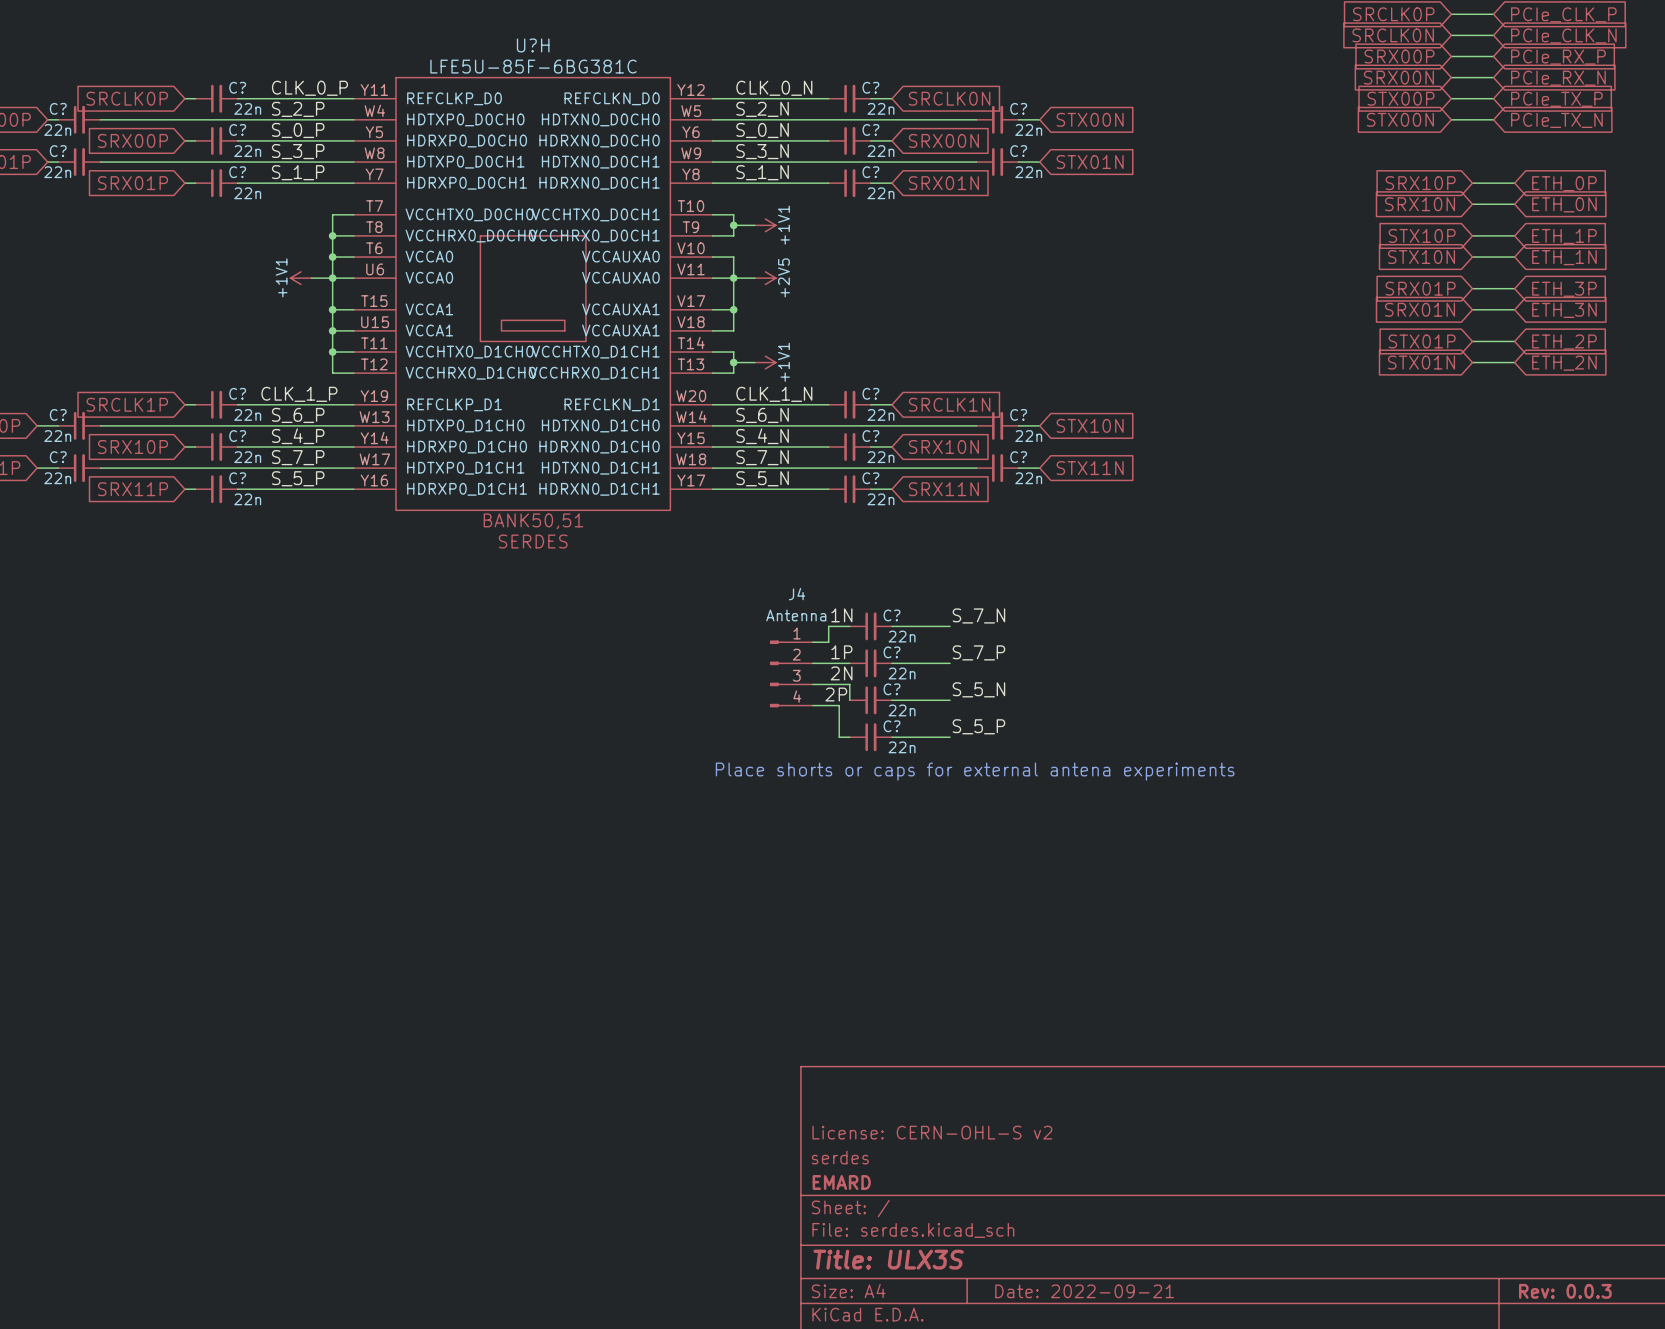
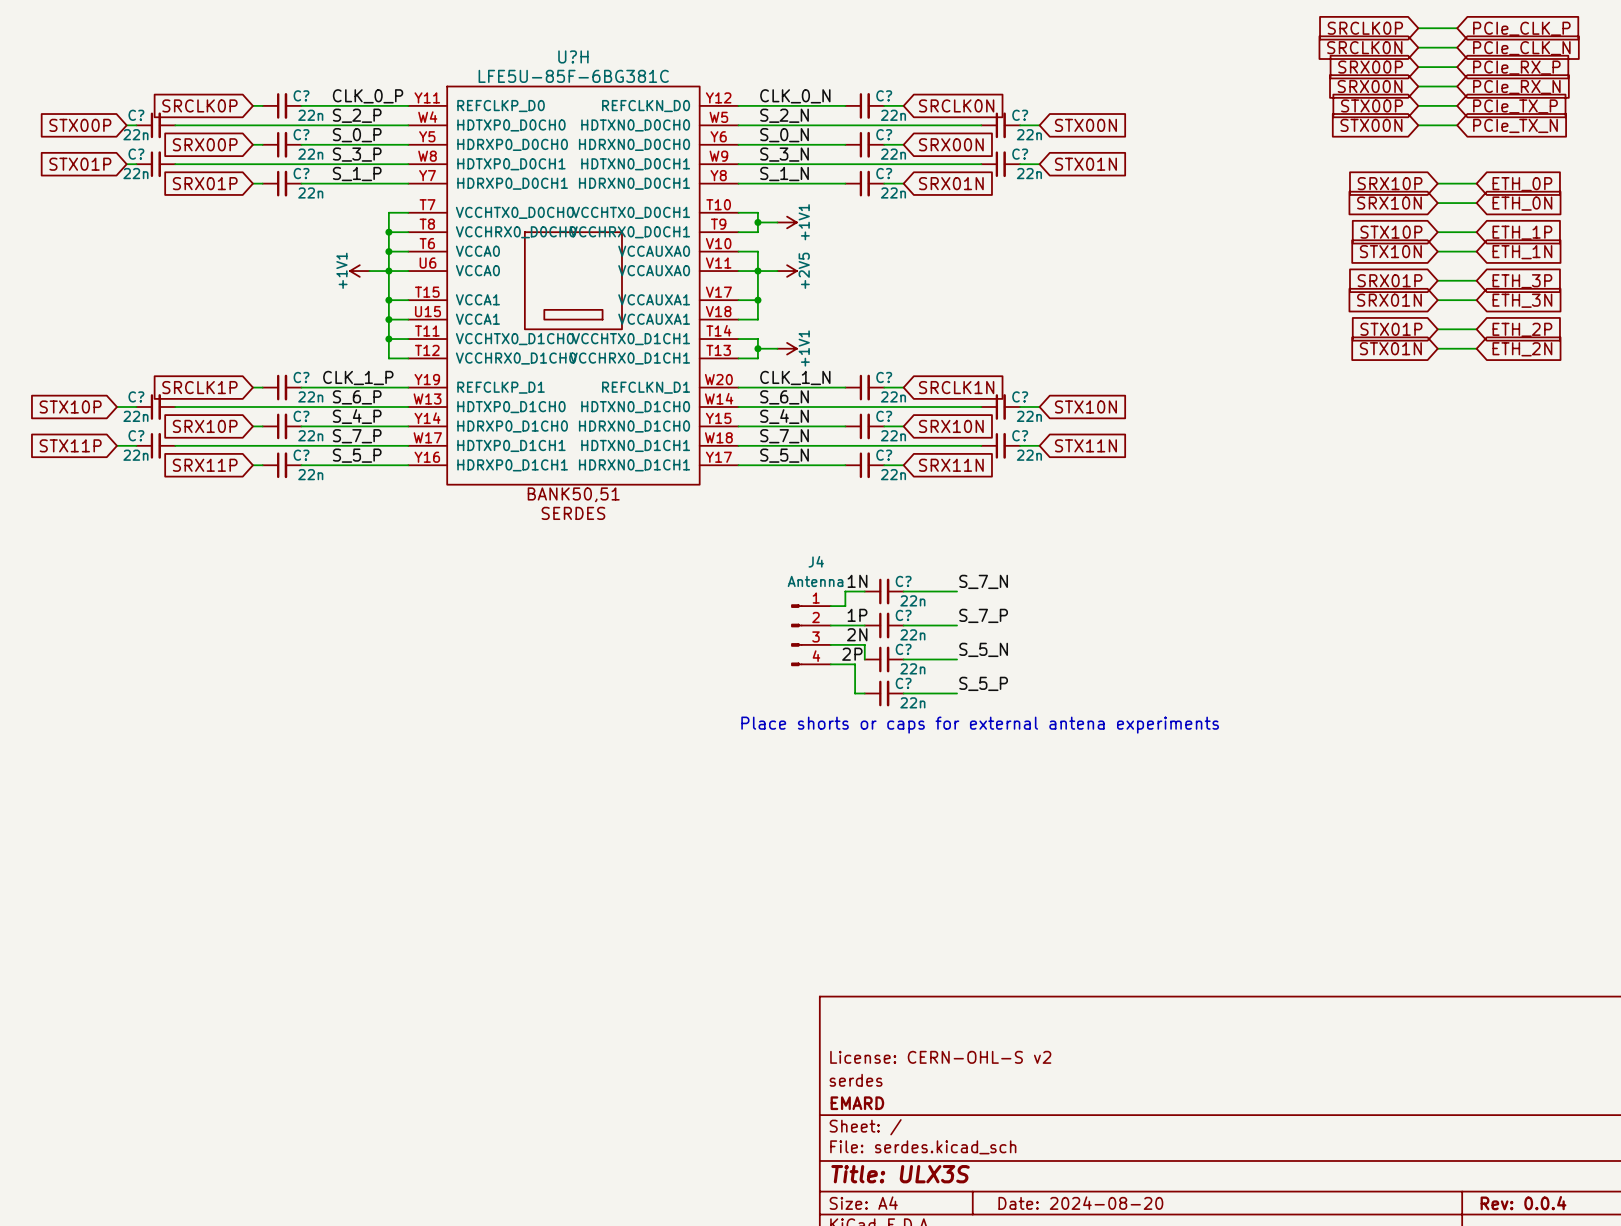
title block: Date: 2022-09-21 (1084, 1291) -> Date: 2024-08-20 (1080, 1203)
title block: Rev: 0.0.3 (1565, 1291) -> Rev: 0.0.4 (1523, 1203)

